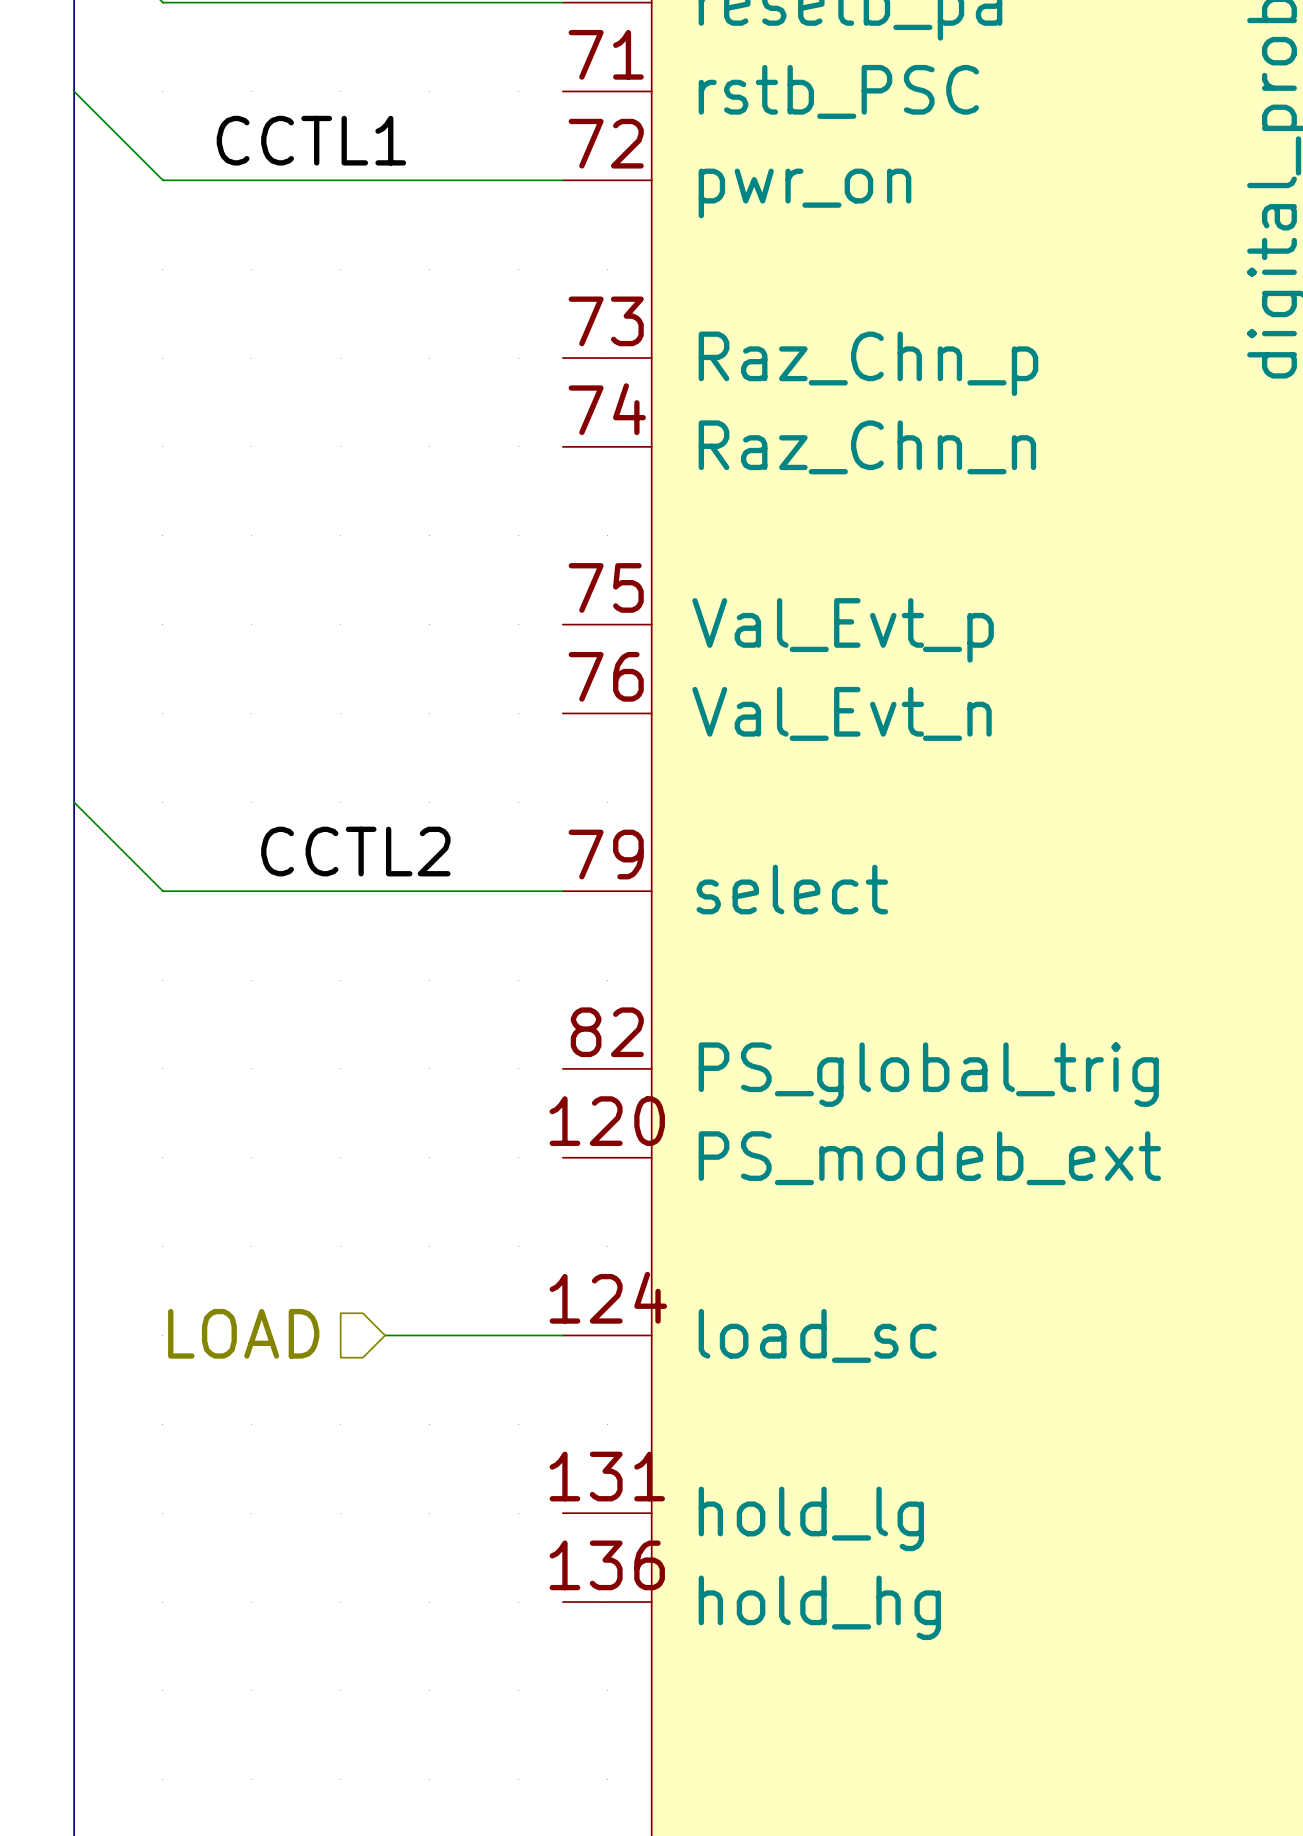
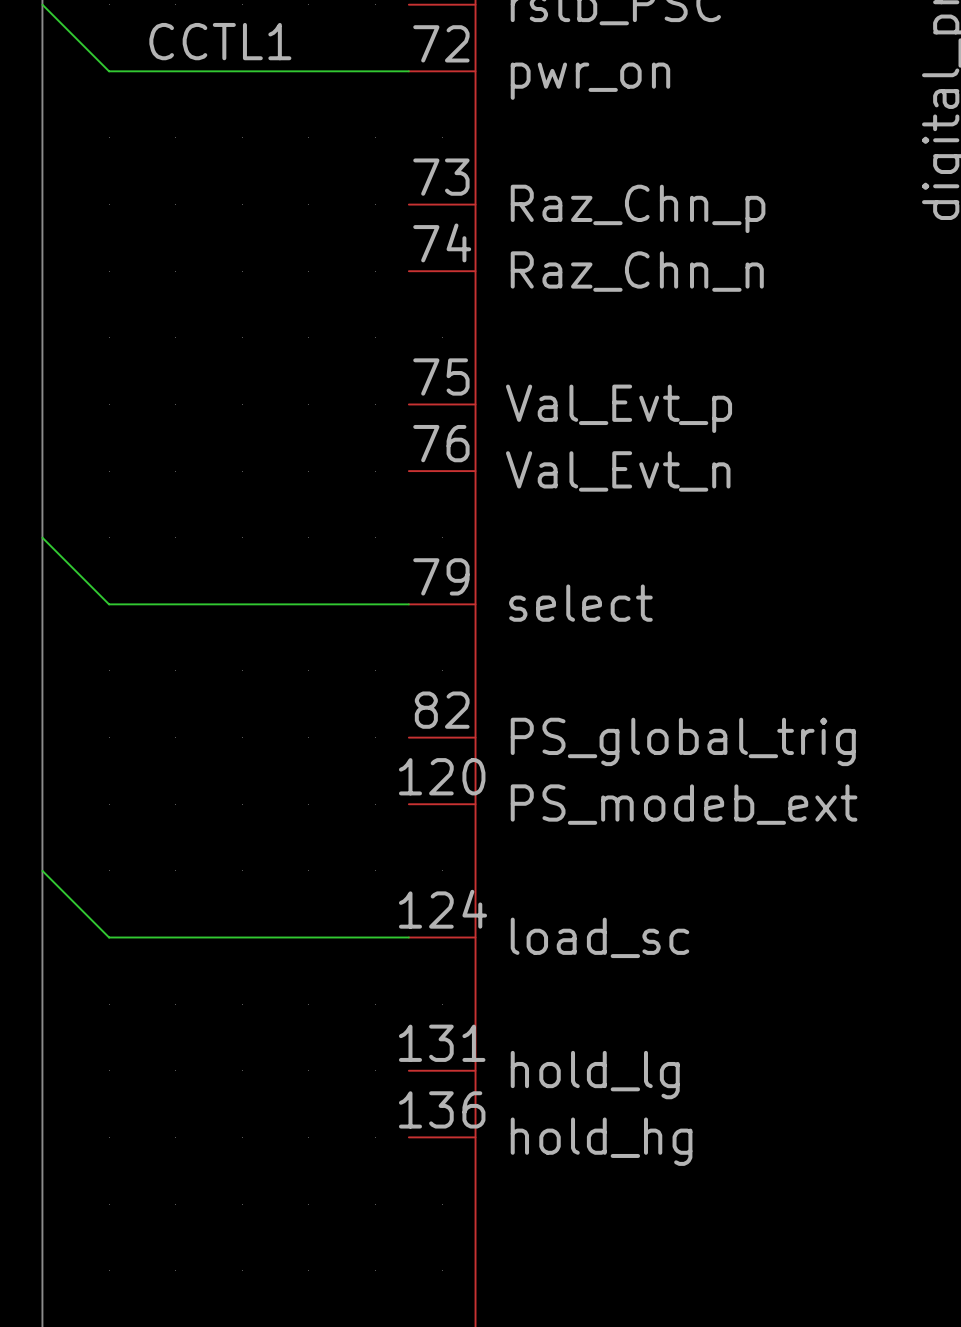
label: CCTL2 (355, 851) -> none
wire: none -> (42, 870) (109, 937) (275, 937)
hierarchical label: LOAD (243, 1333) -> none

